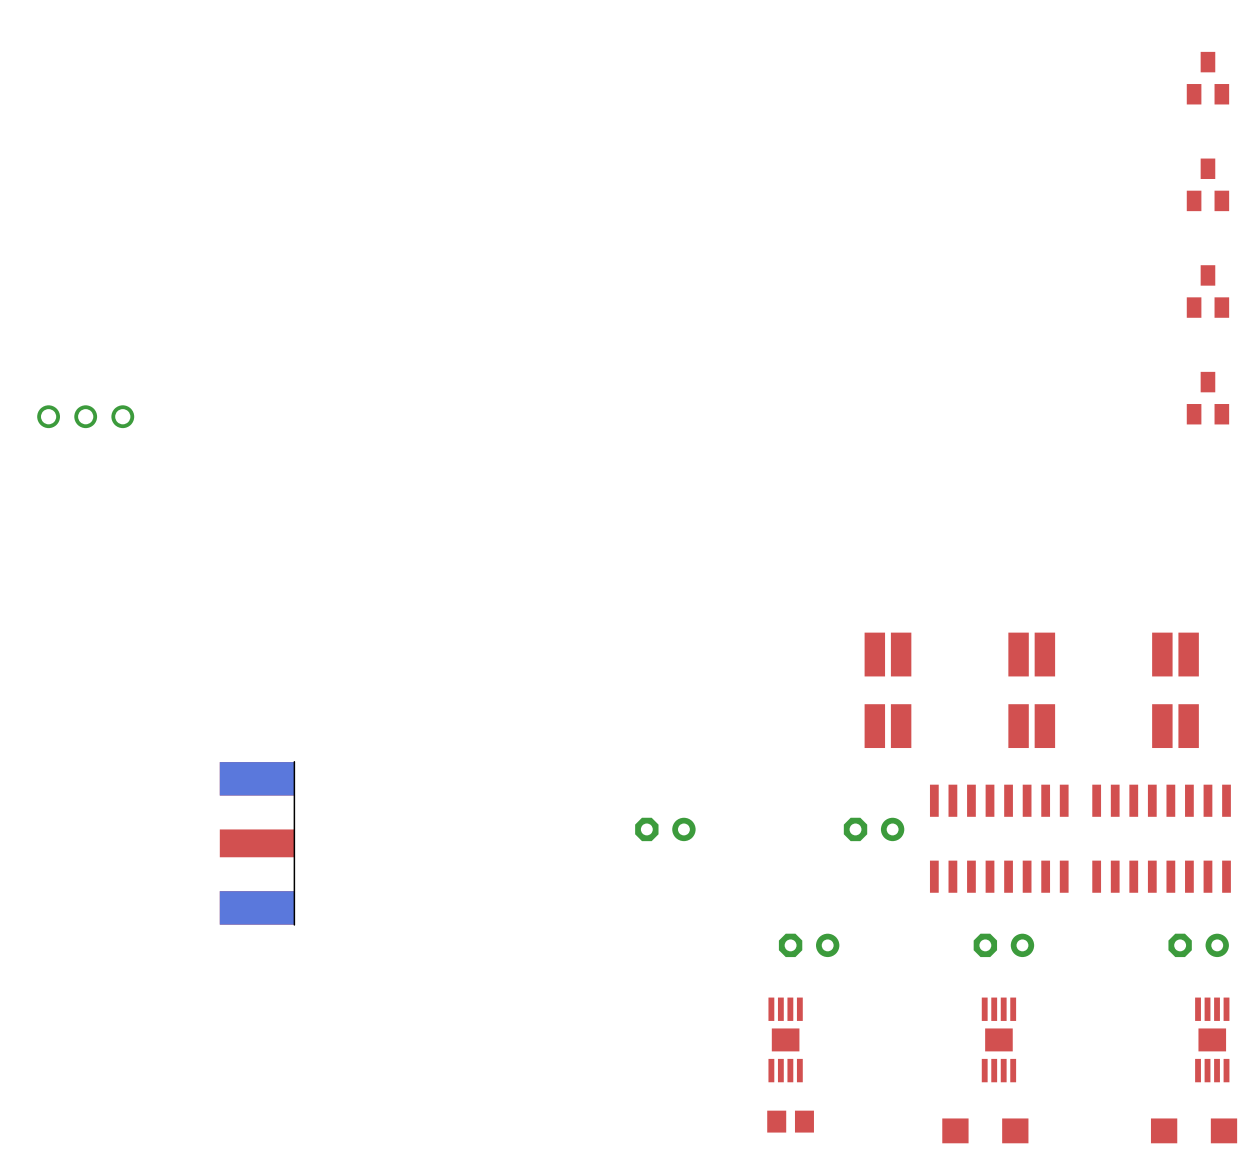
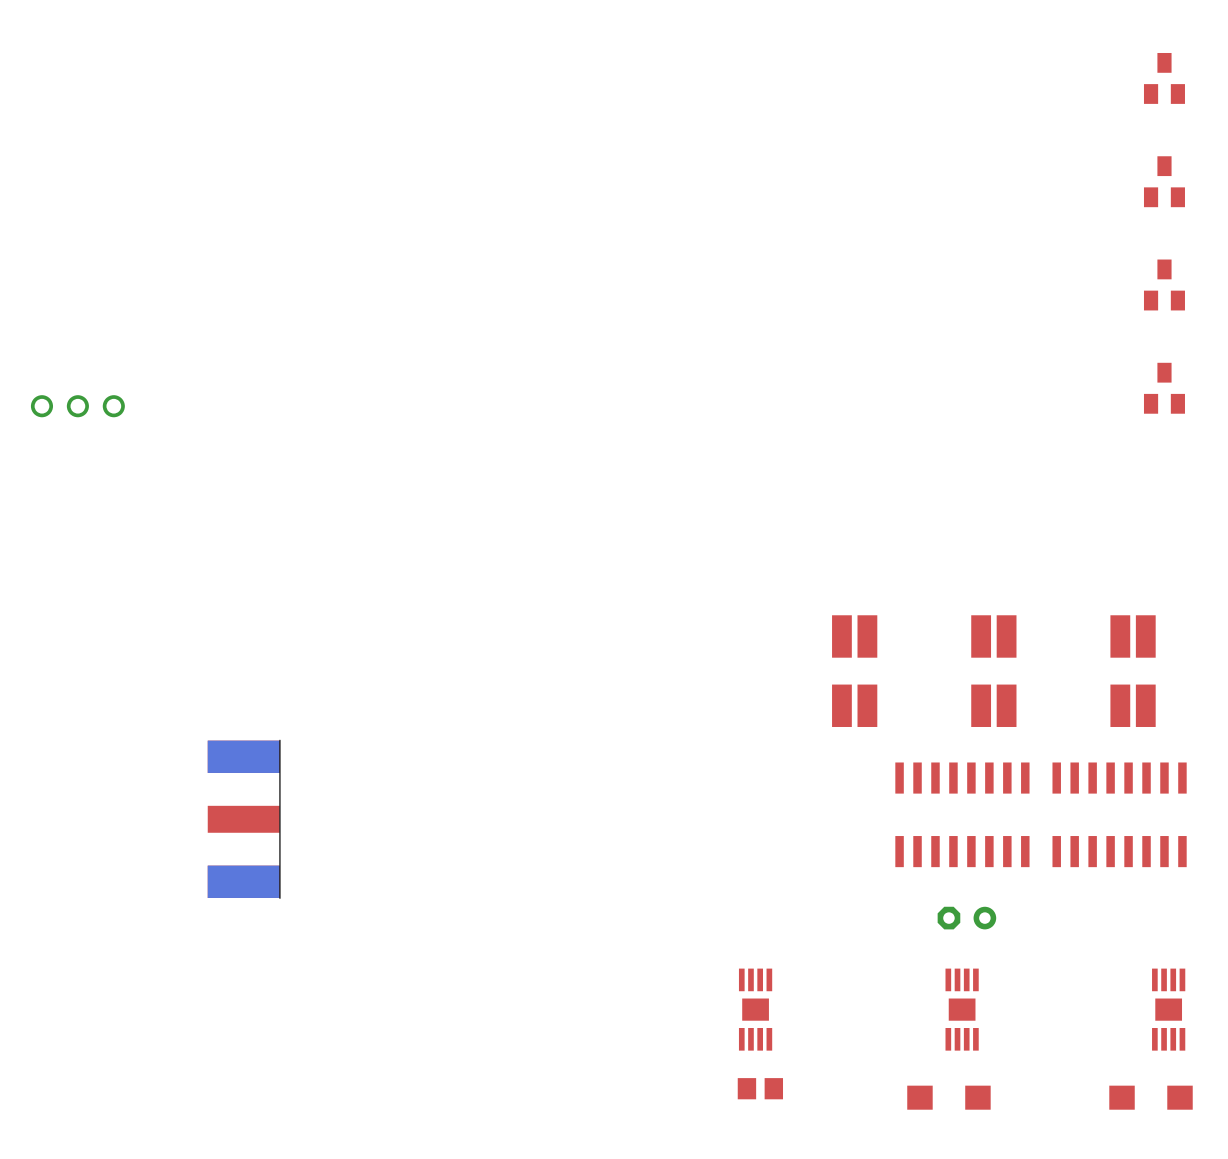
part: (665, 829) -> none
part: (874, 829) -> none
part: (809, 945) -> none
part: (1198, 945) -> none

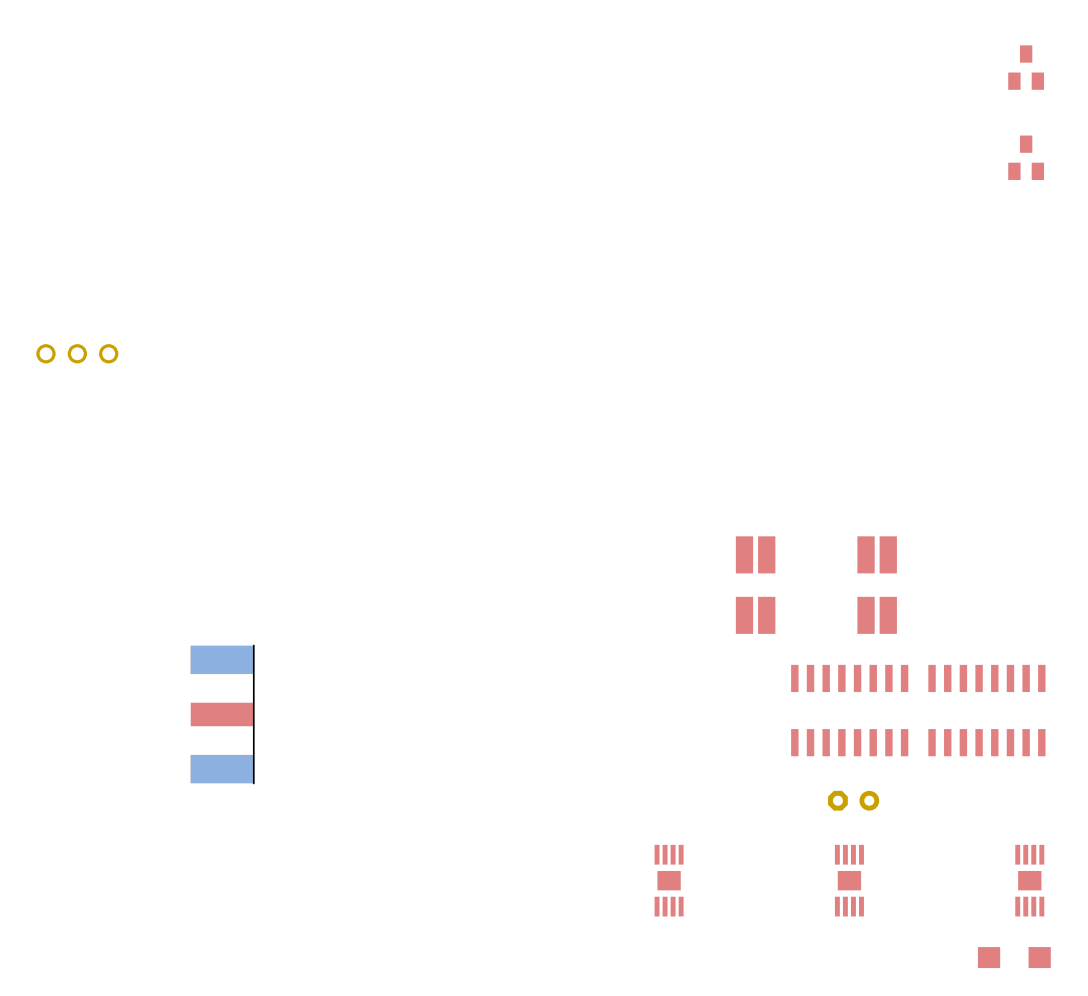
part: (1164, 284) -> none
part: (1164, 388) -> none
part: (1133, 671) -> none
part: (760, 1088) -> none
part: (948, 1097) -> none

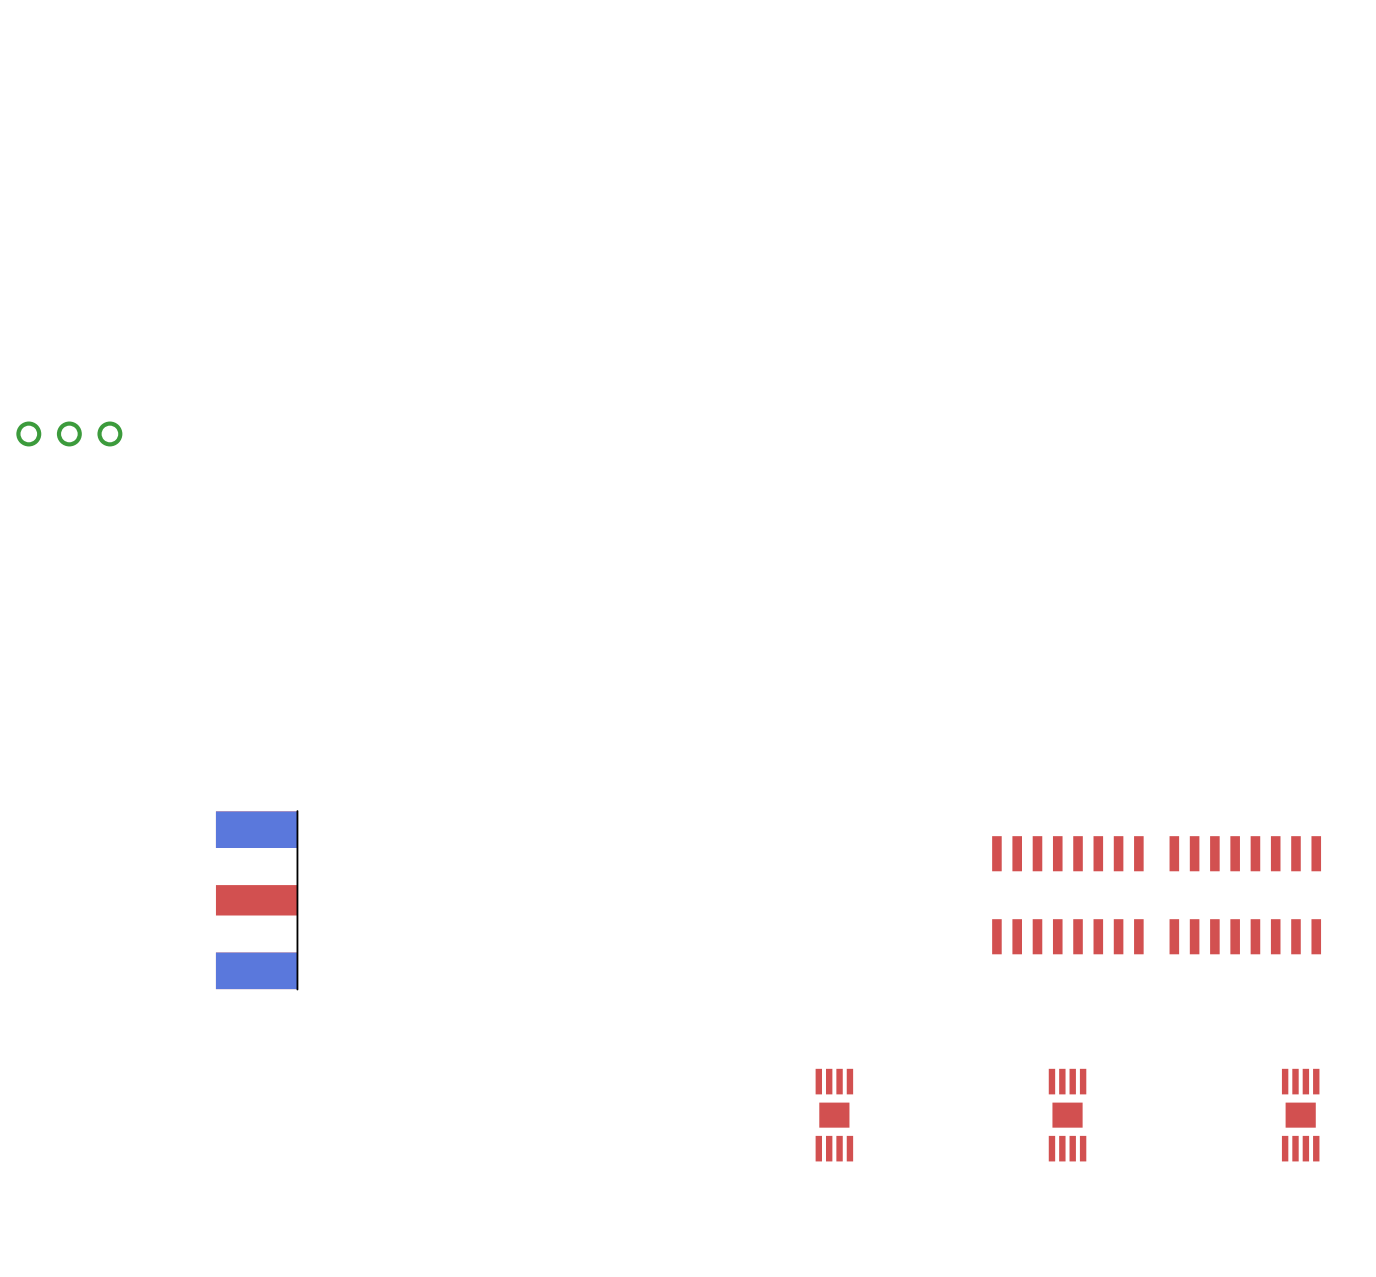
part: (1026, 67) -> none
part: (1026, 157) -> none
part: (755, 585) -> none
part: (877, 585) -> none
part: (853, 800) -> none
part: (1014, 957) -> none

